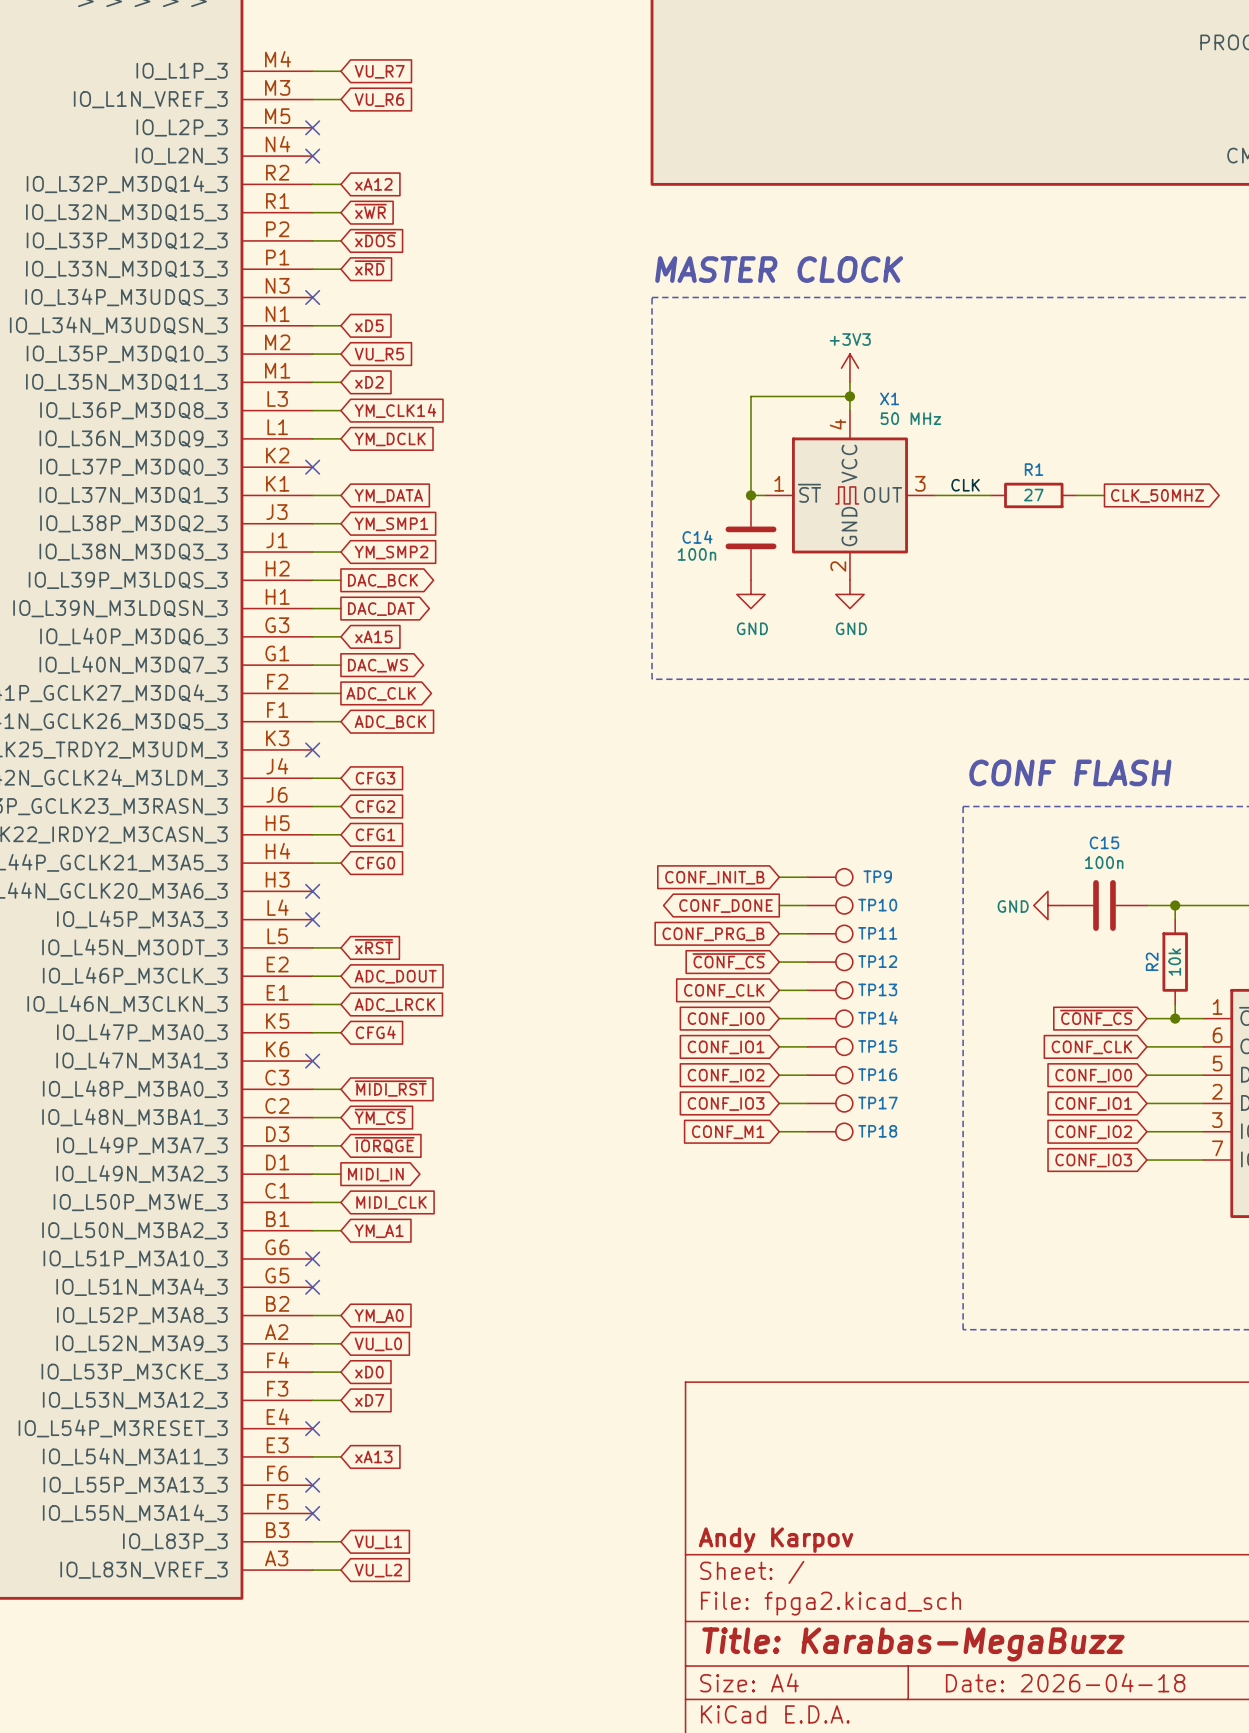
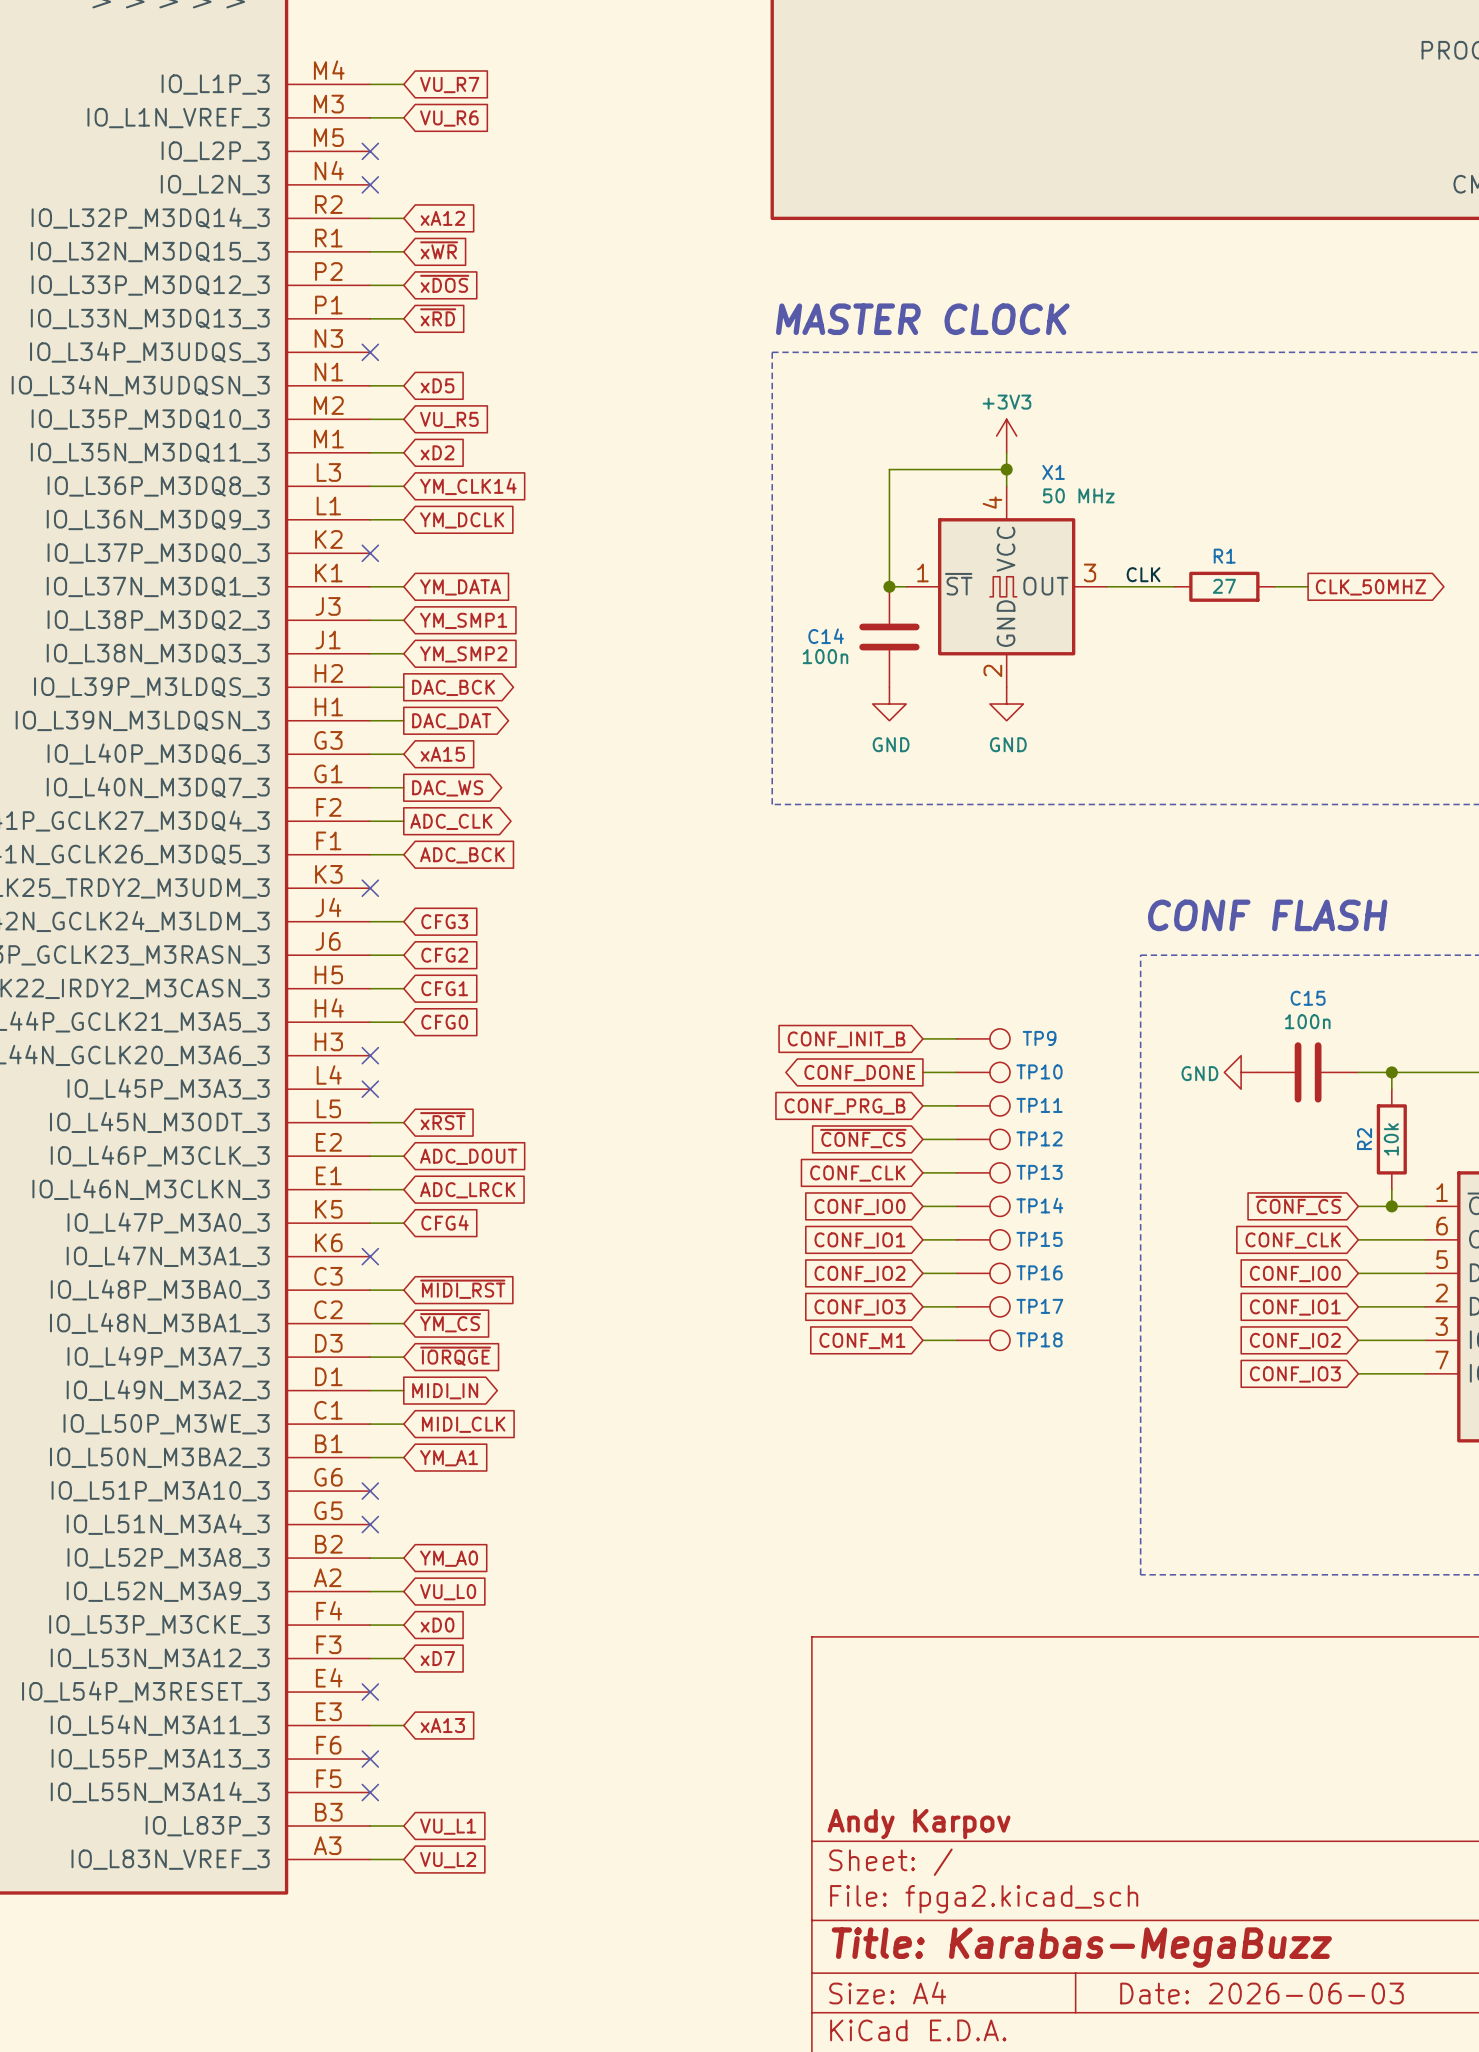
title block: Date: 2026-04-18 (1065, 1682) -> Date: 2026-06-03 (1262, 1993)

